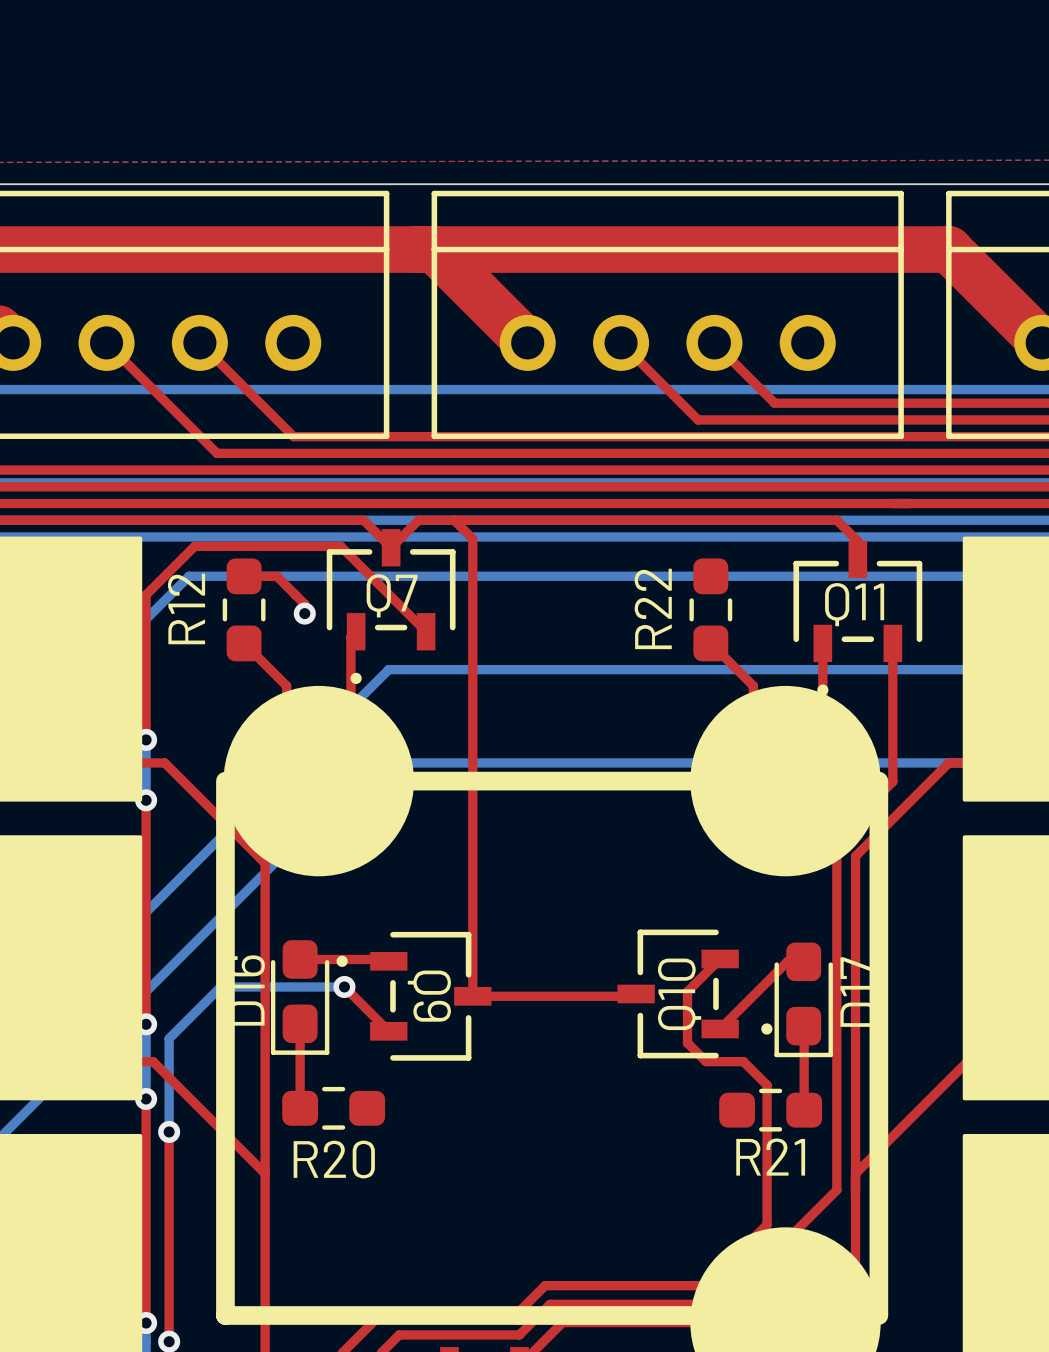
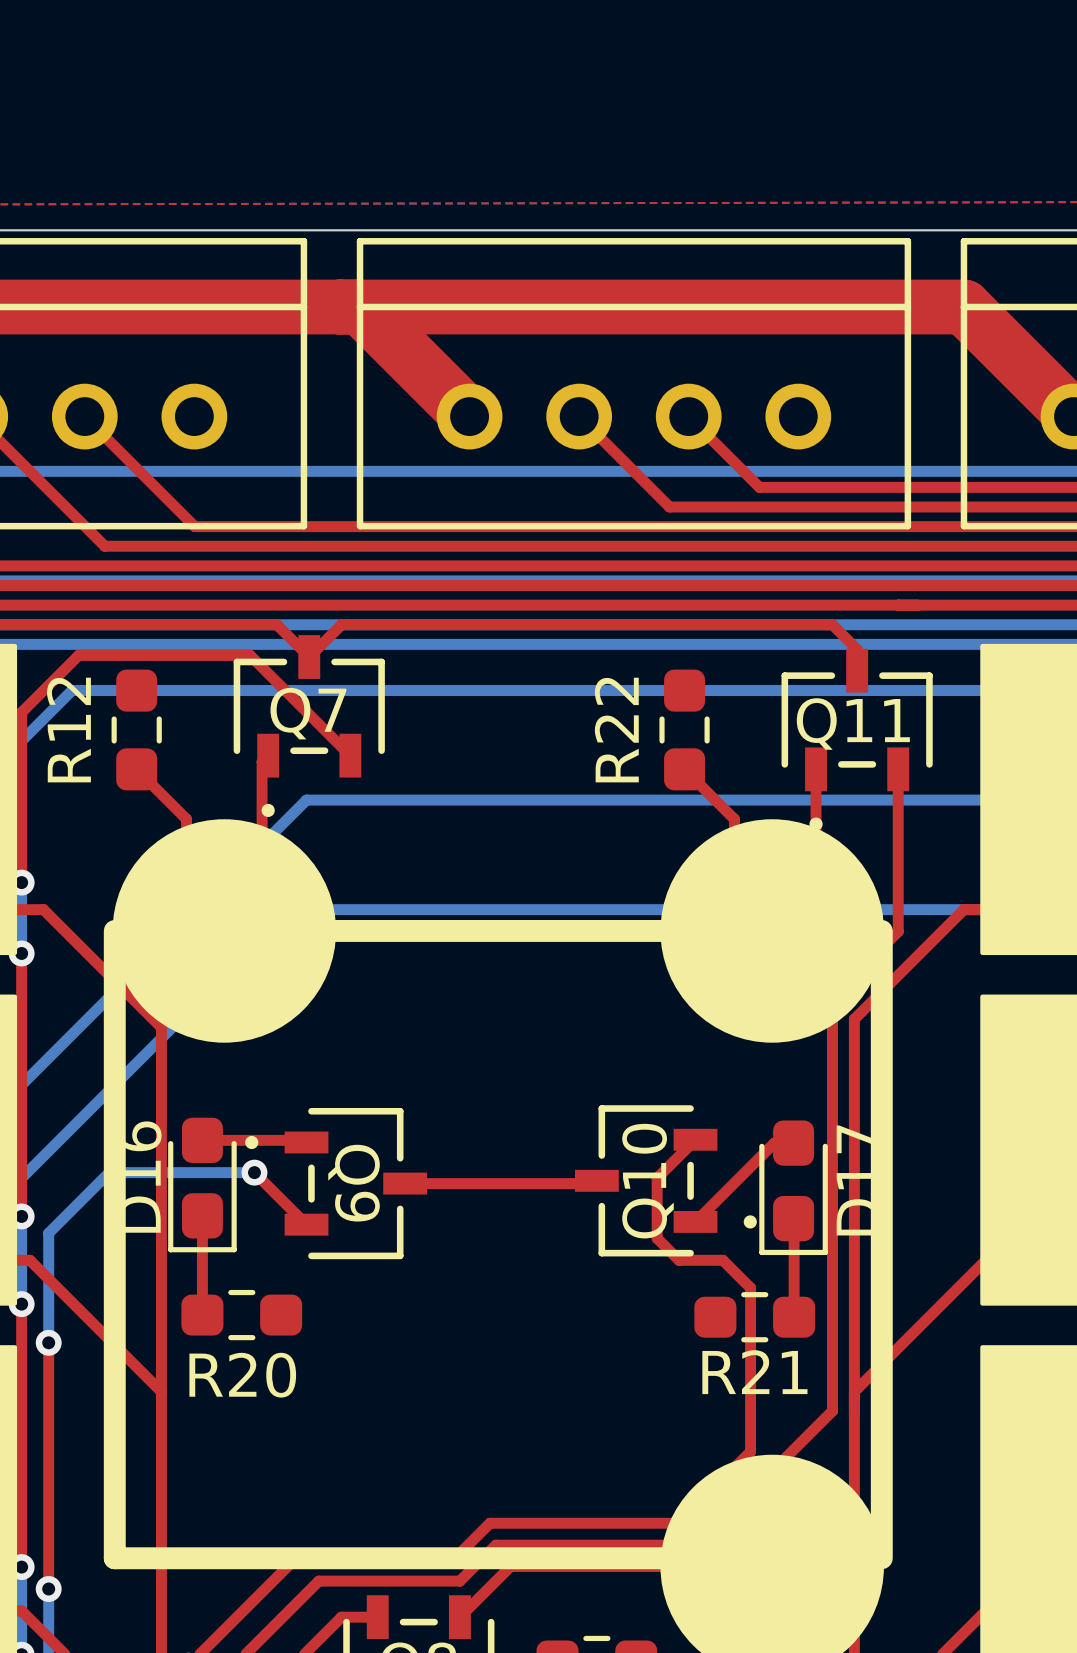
top track: (454, 520) (472, 538) (472, 996) -> none
top track: (244, 576) (276, 576) (304, 604) (304, 613) -> none
via: (304, 613) -> none

